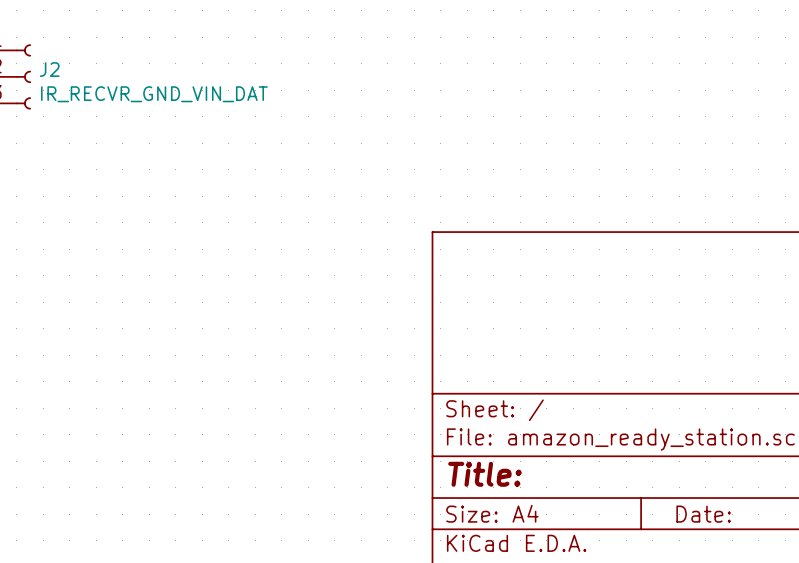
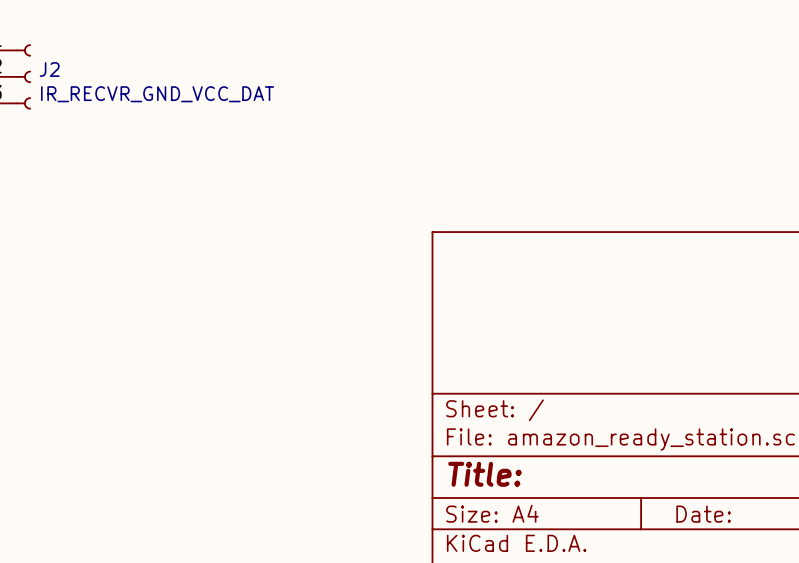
J2 value: IR_RECVR_GND_VIN_DAT (154, 94) -> IR_RECVR_GND_VCC_DAT (157, 94)

